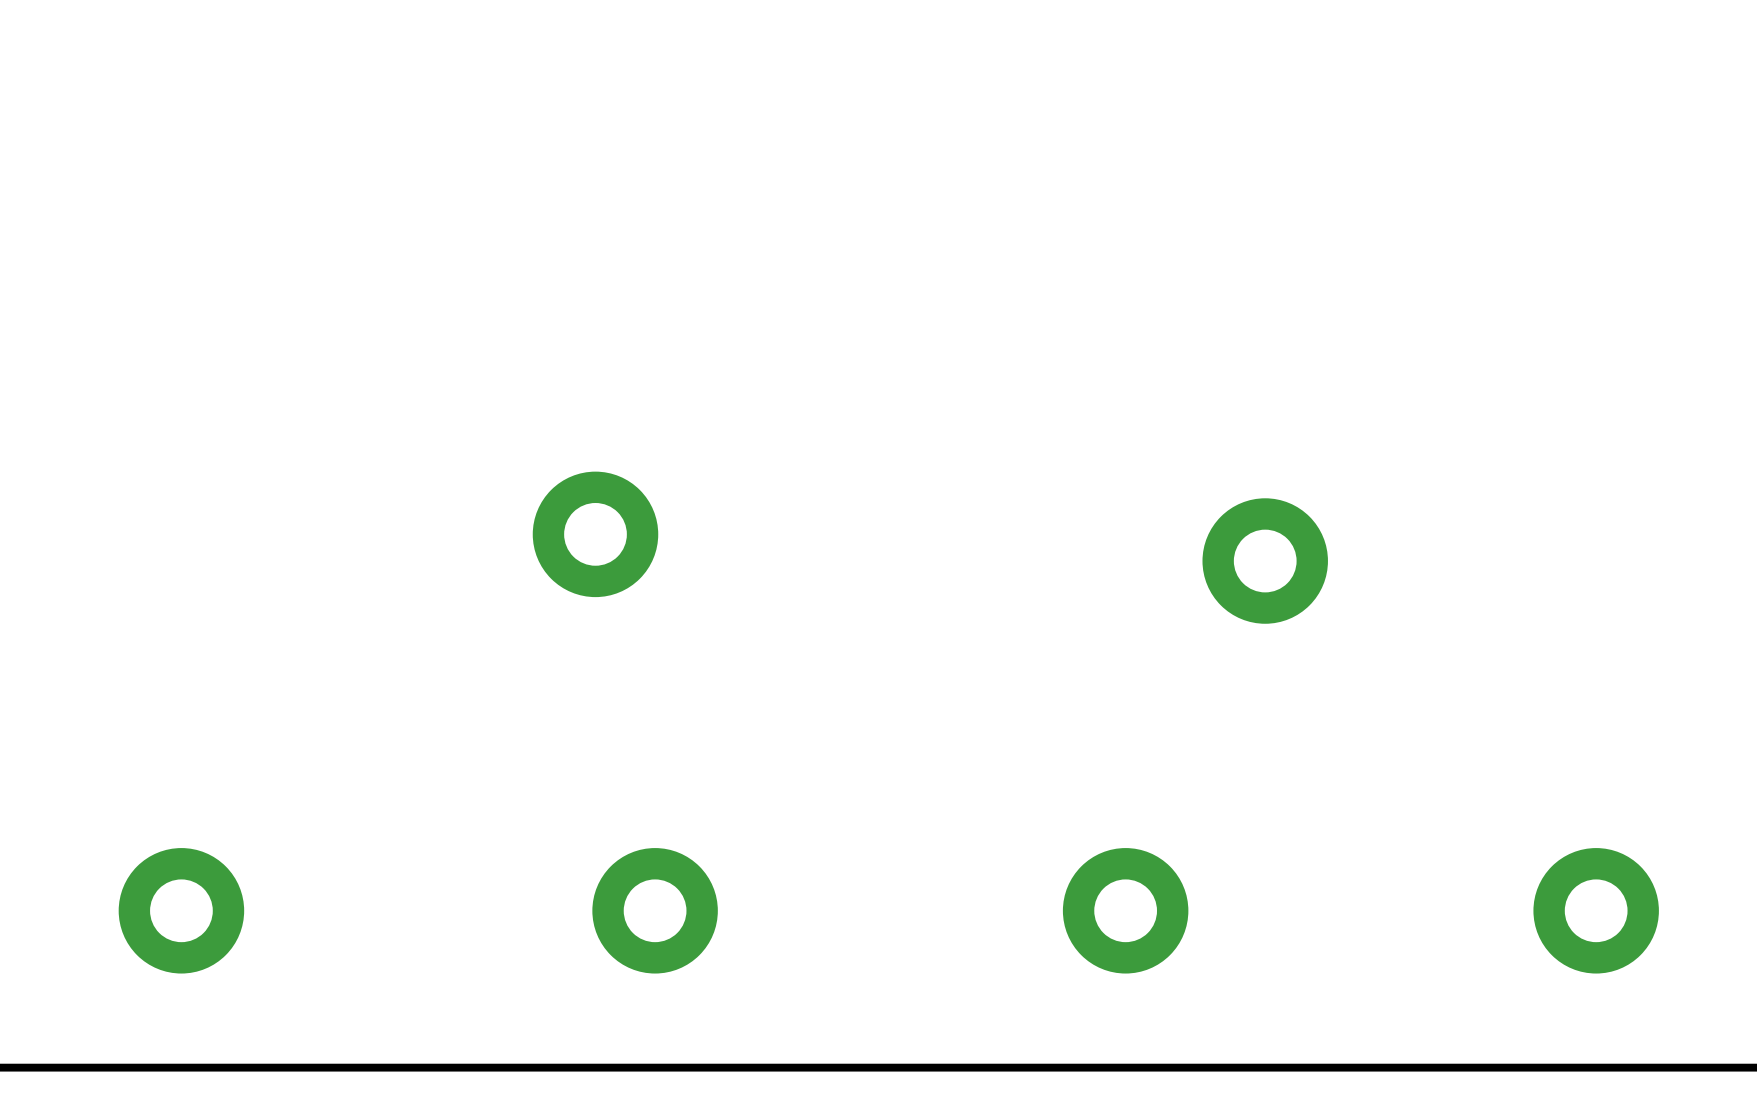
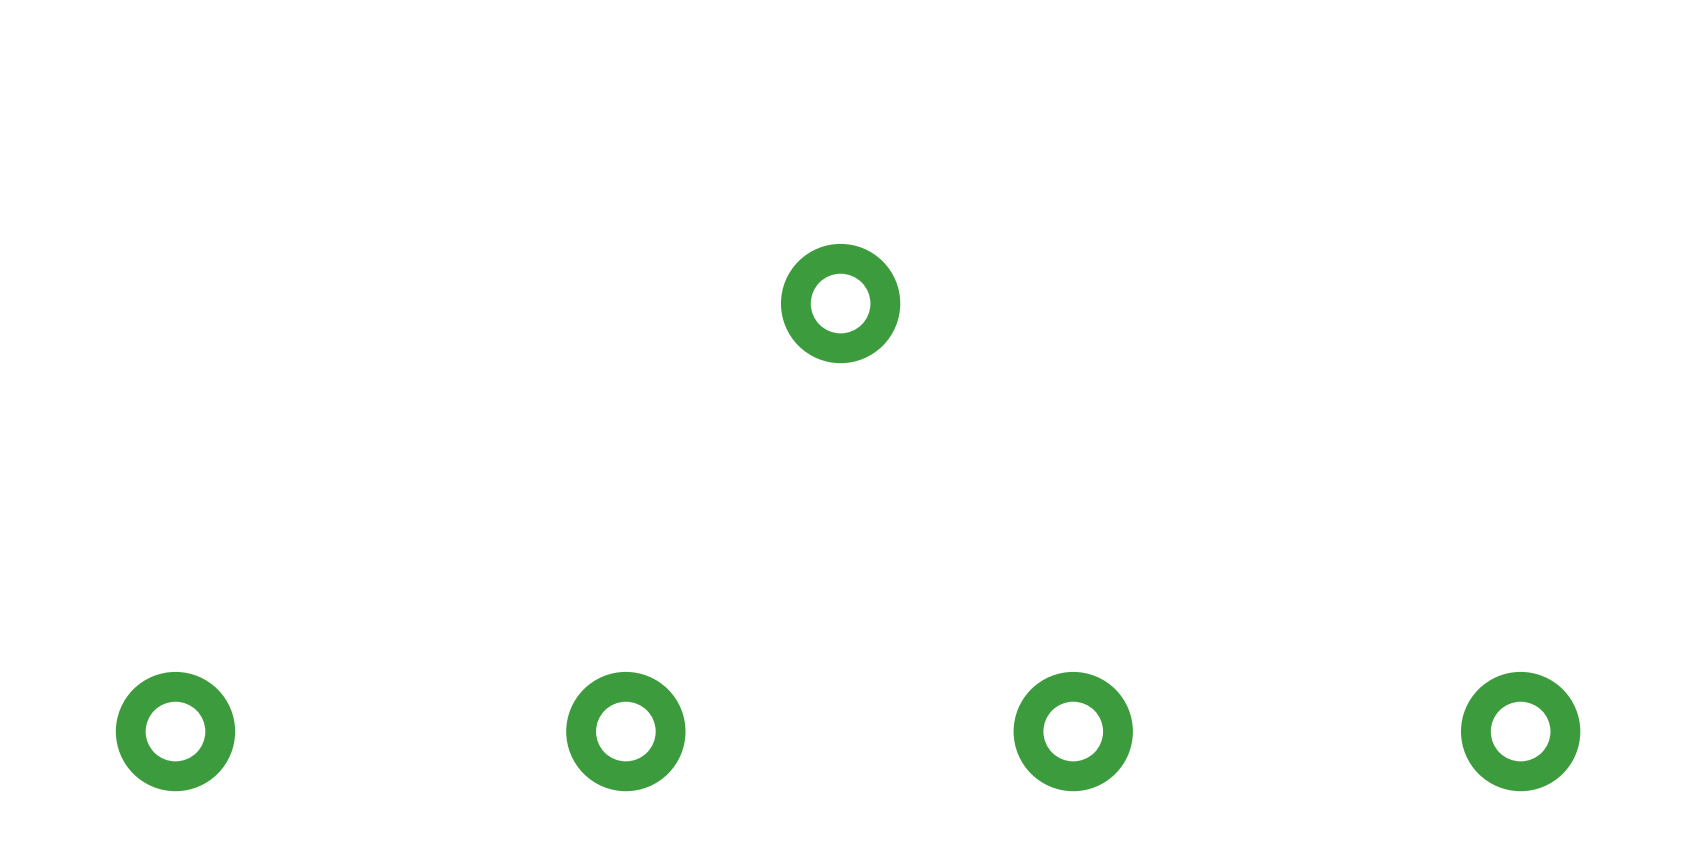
via: none -> (840, 303)
via: (595, 534) -> none
via: (1265, 561) -> none

